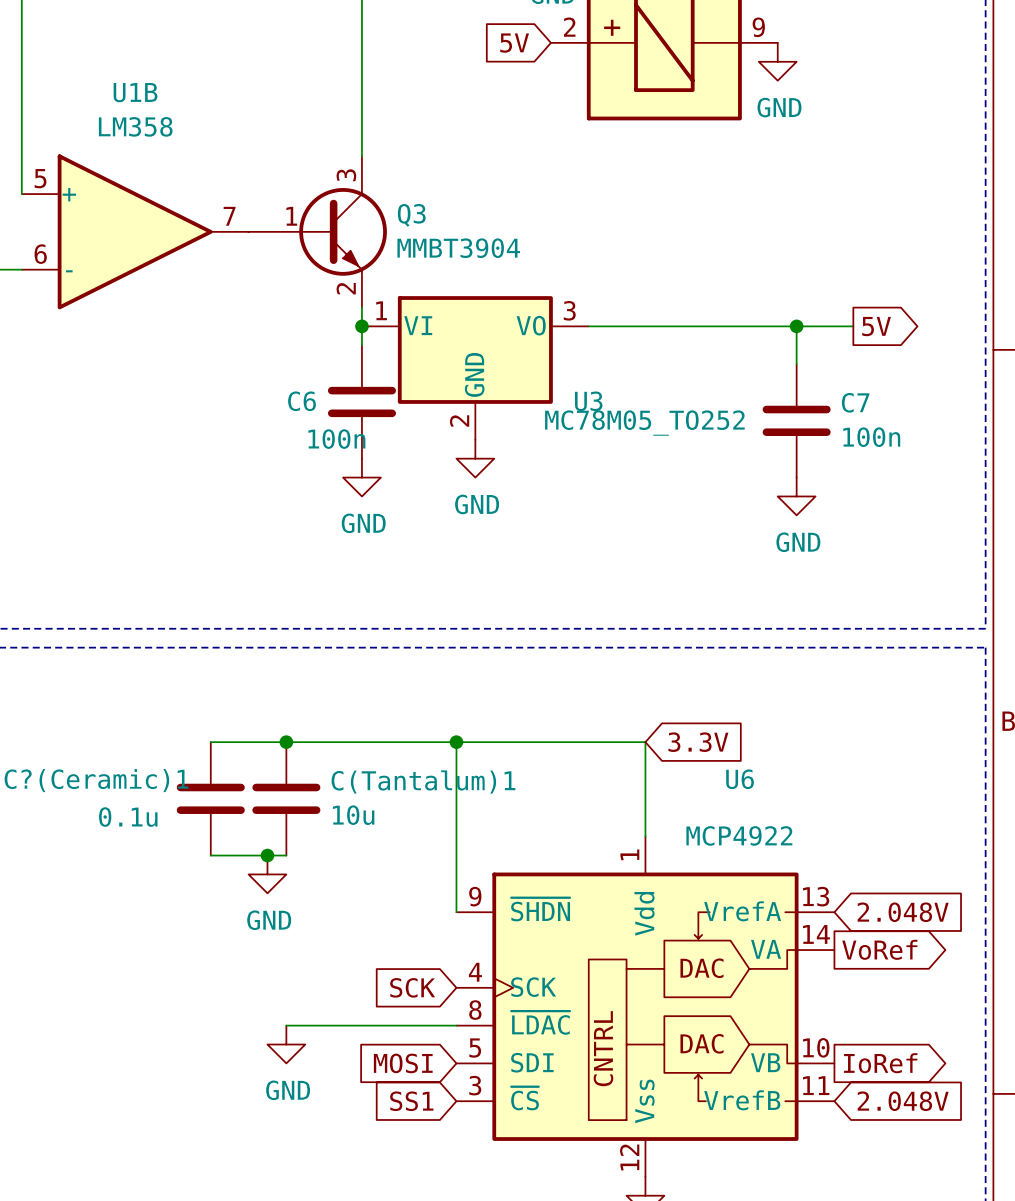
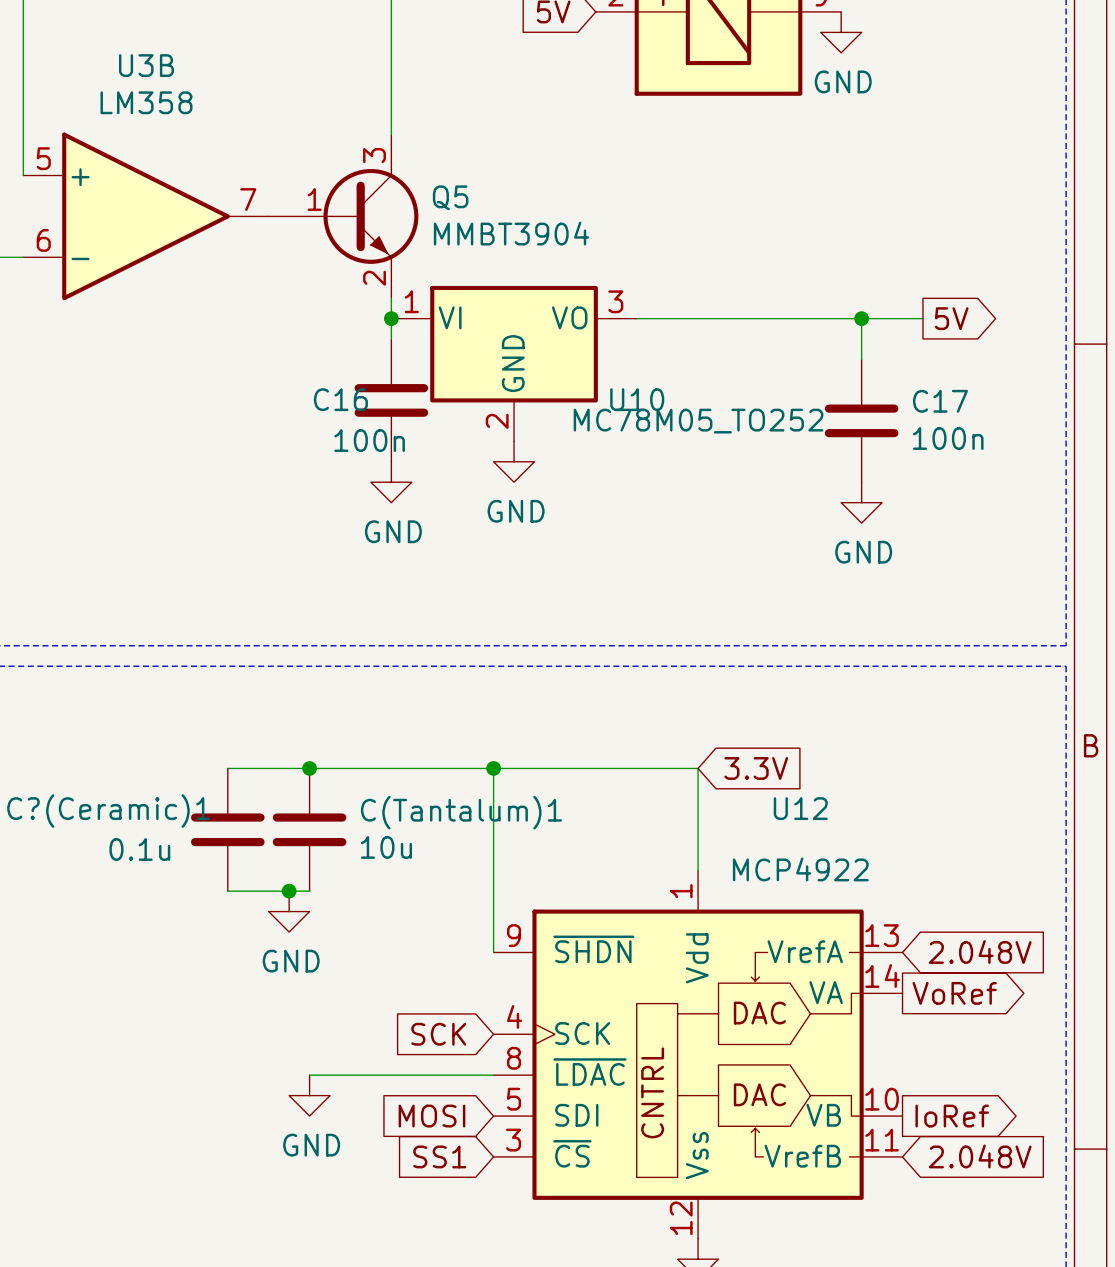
U1B name: U1B (135, 92) -> U3B (146, 65)
Q3 name: Q3 (411, 215) -> Q5 (450, 197)
C6 name: C6 (302, 401) -> C16 (340, 399)
U3 name: U3 (588, 401) -> U10 (637, 399)
C7 name: C7 (855, 402) -> C17 (940, 401)
U6 name: U6 (740, 779) -> U12 (800, 808)

